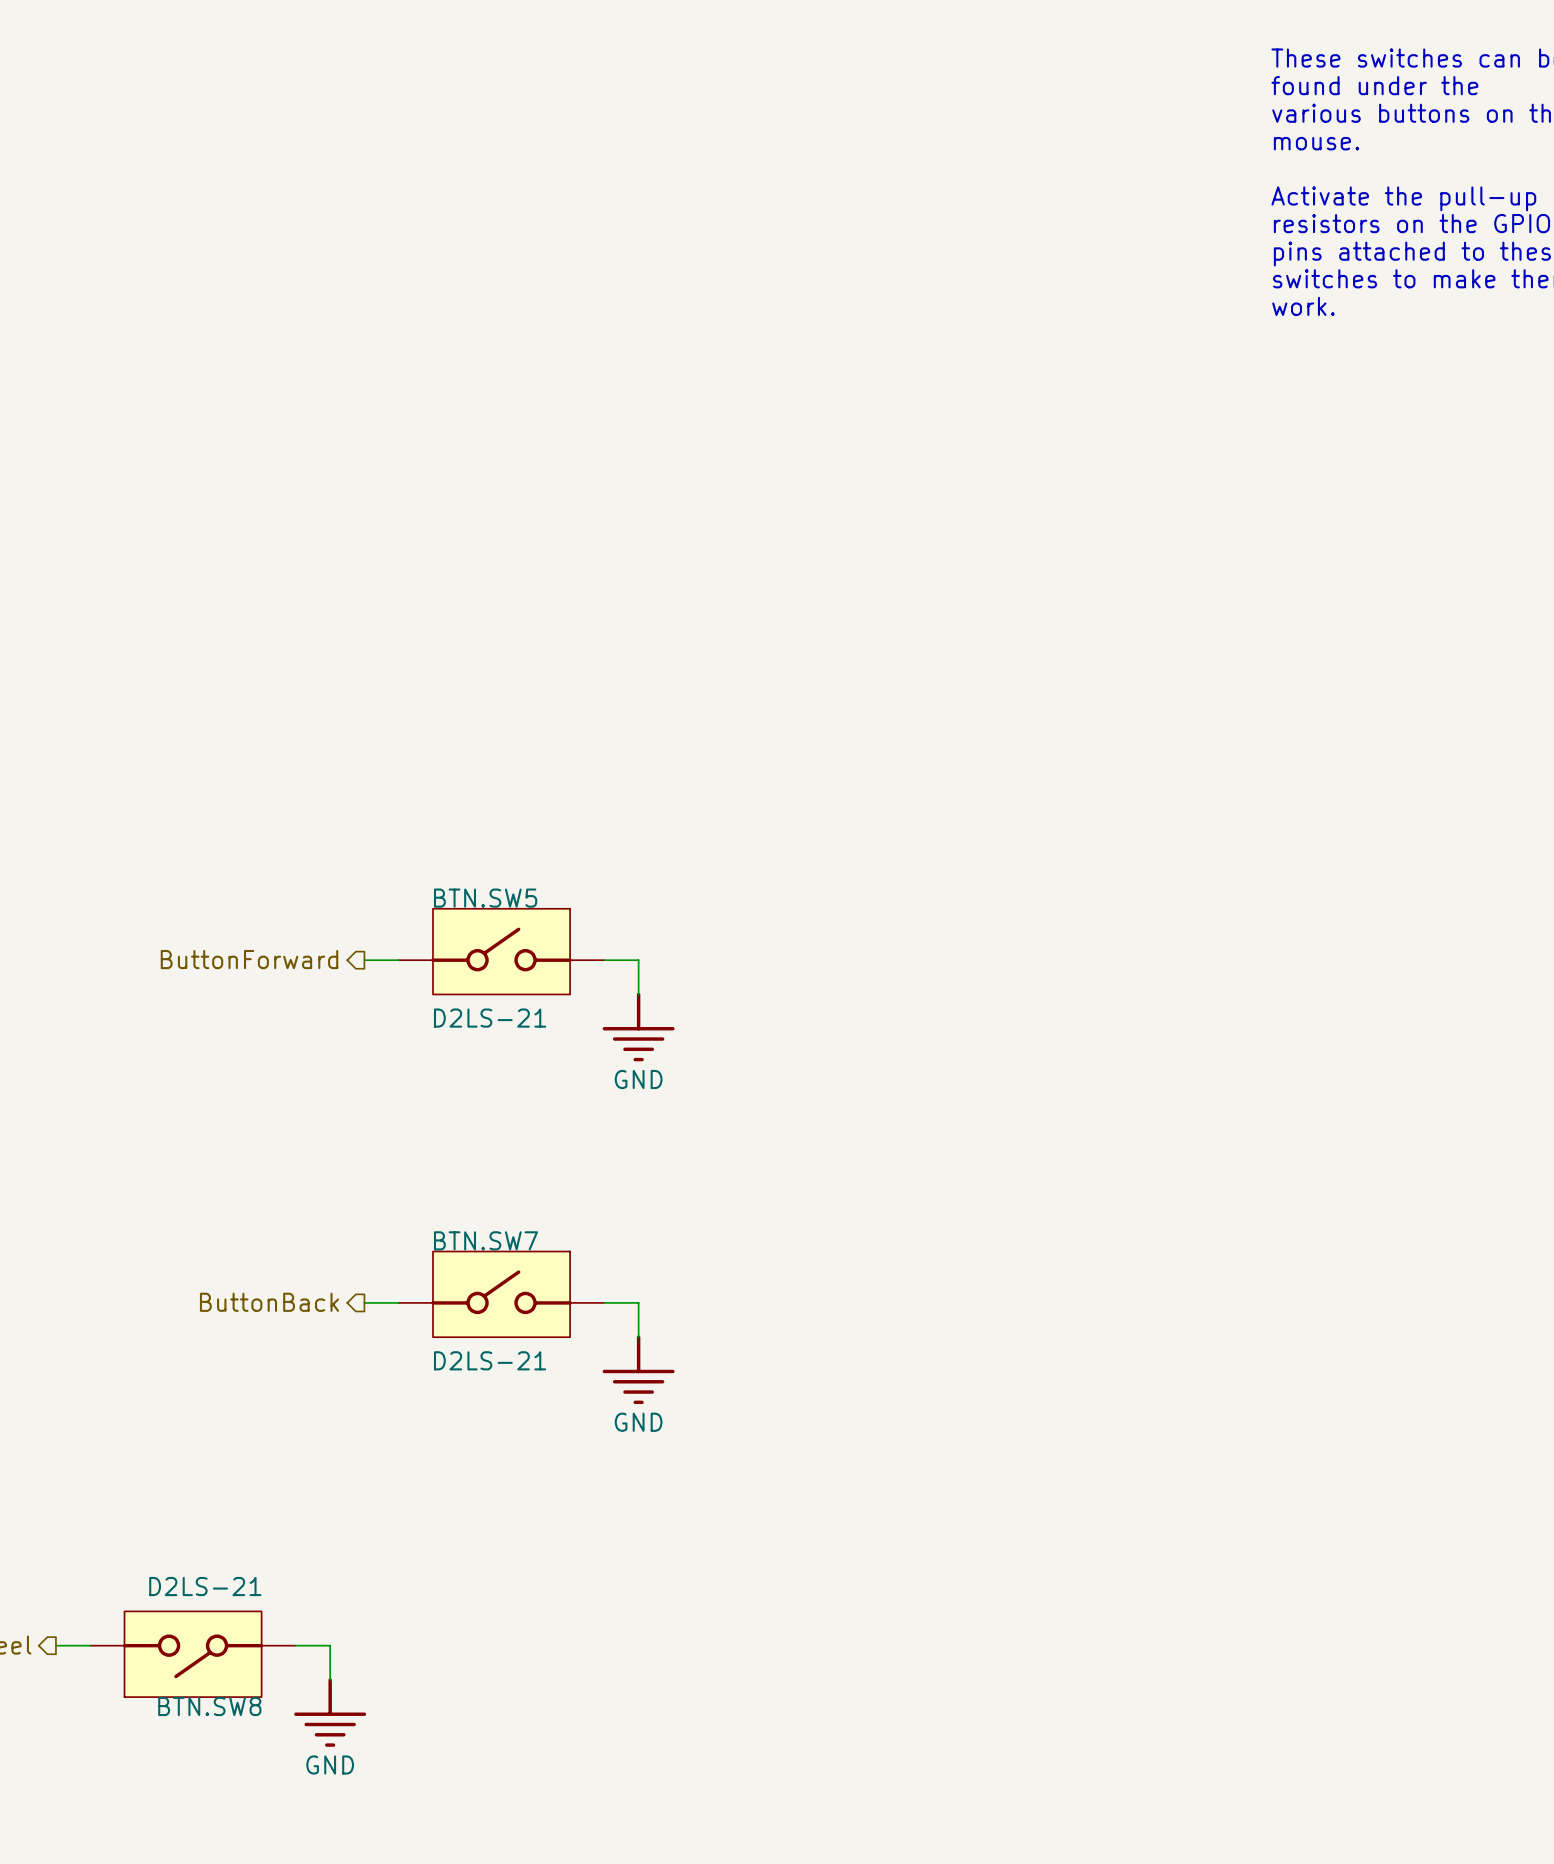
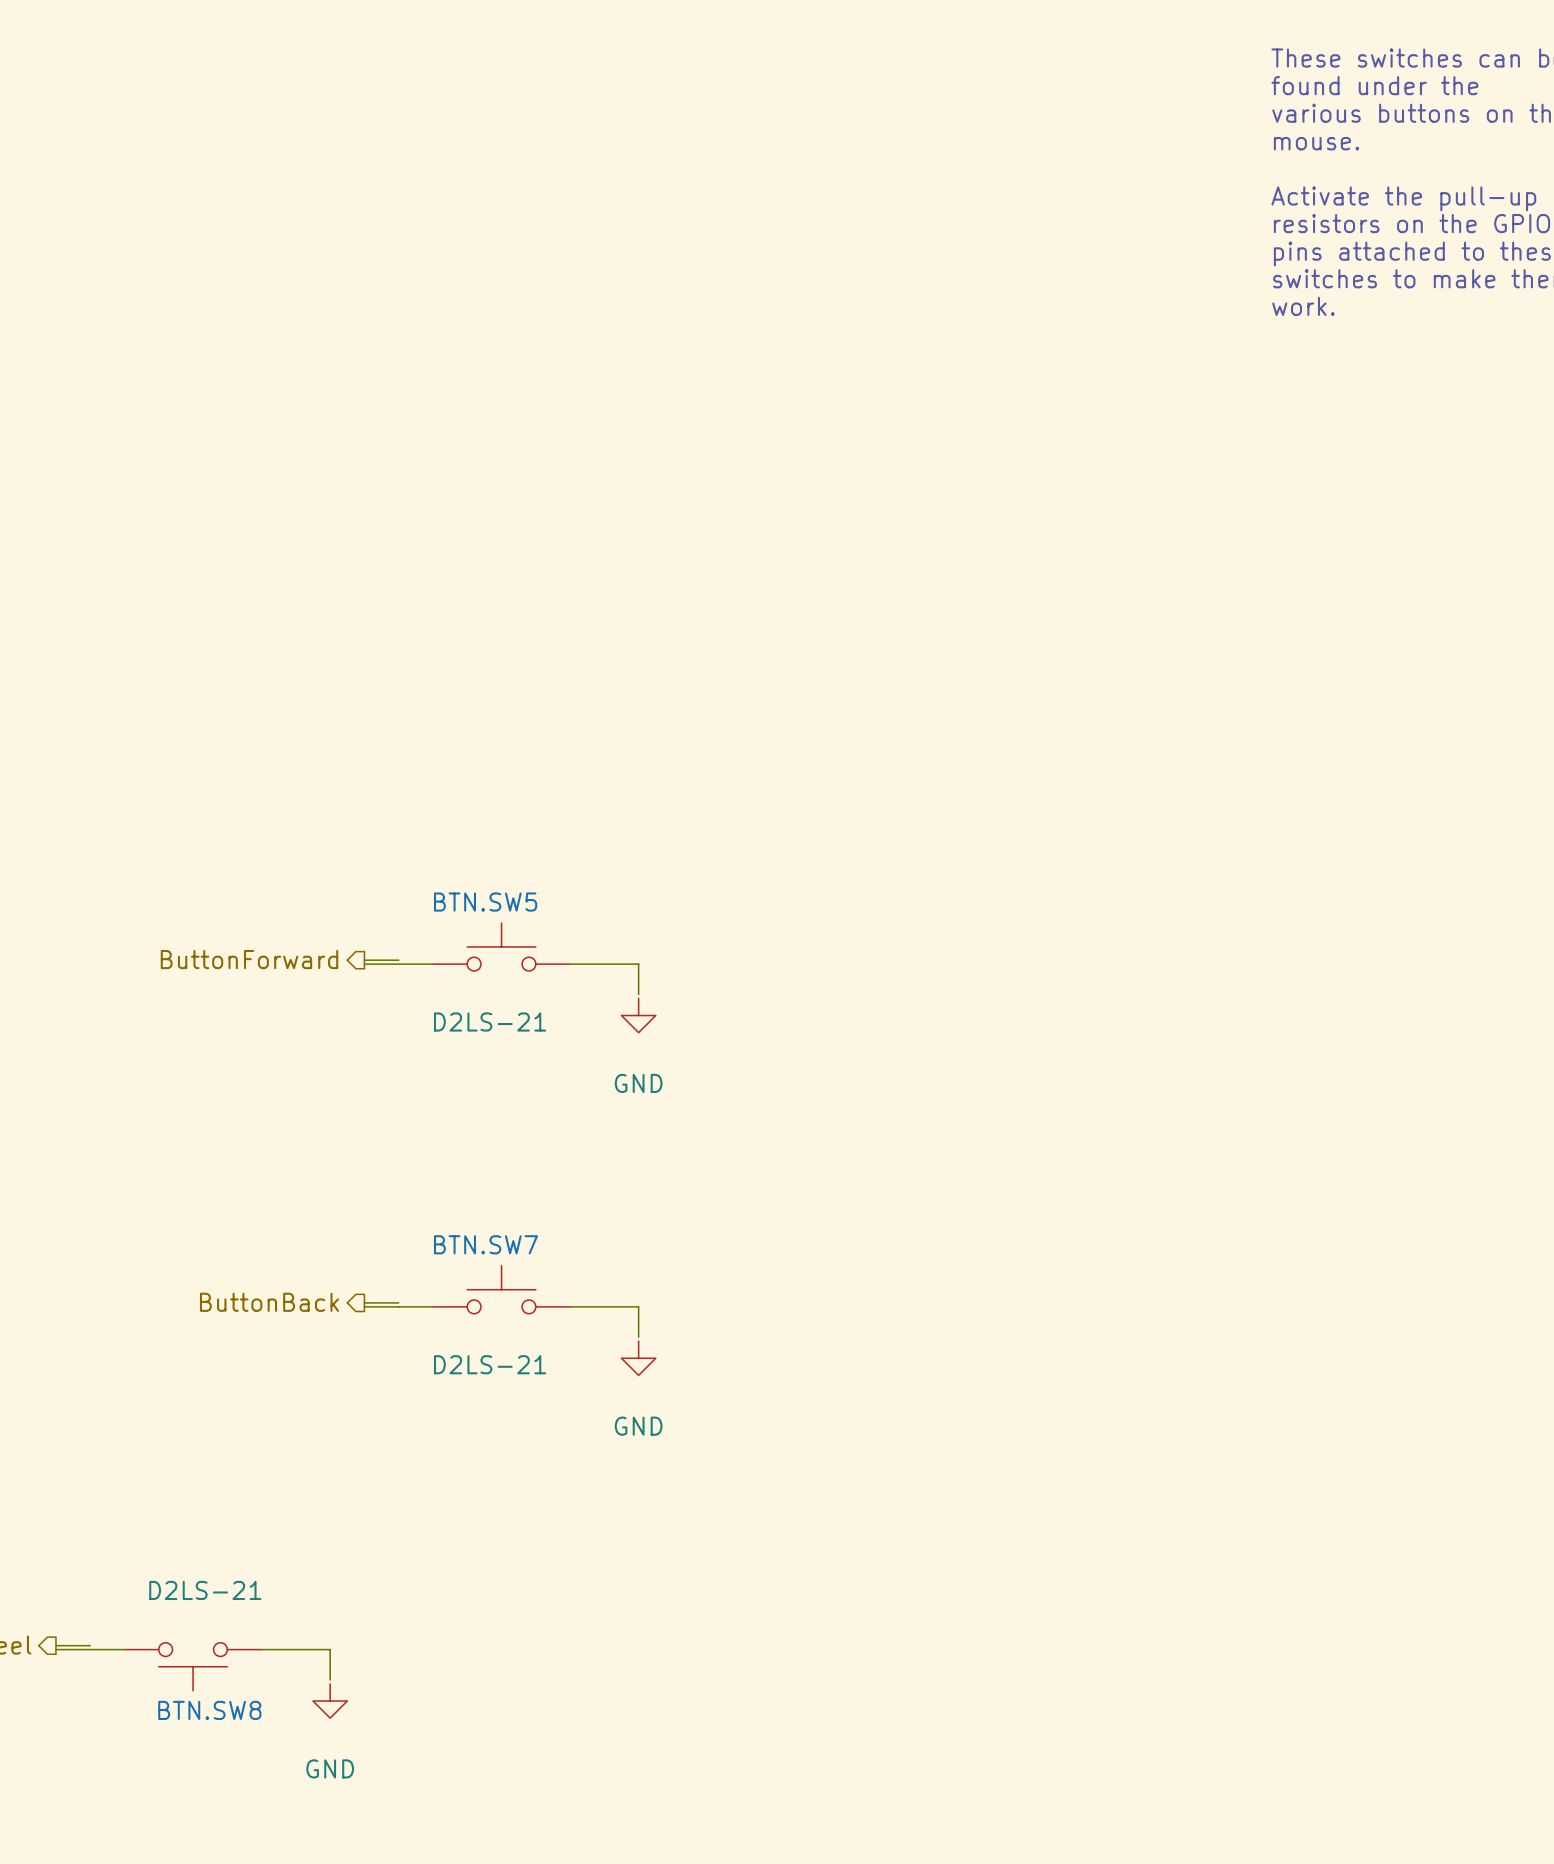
BTN.SW5 symbol: [398, 908, 605, 995] -> [432, 922, 571, 971]
wire: (604, 960) (638, 960) (638, 964) -> (570, 964) (638, 964)
wire: none -> (364, 964) (432, 964)
power symbol shape: [602, 992, 675, 1062] -> [621, 998, 656, 1033]
BTN.SW7 symbol: [398, 1251, 605, 1338] -> [432, 1265, 571, 1314]
wire: (604, 1302) (638, 1302) (638, 1306) -> (570, 1306) (638, 1306)
wire: none -> (364, 1306) (432, 1306)
power symbol shape: [602, 1335, 675, 1405] -> [621, 1341, 656, 1376]
BTN.SW8 symbol: [90, 1611, 296, 1698] -> [124, 1642, 262, 1691]
wire: (295, 1645) (330, 1645) (330, 1649) -> (261, 1649) (330, 1649)
wire: none -> (55, 1649) (124, 1649)
power symbol shape: [294, 1678, 367, 1747] -> [313, 1683, 348, 1719]

